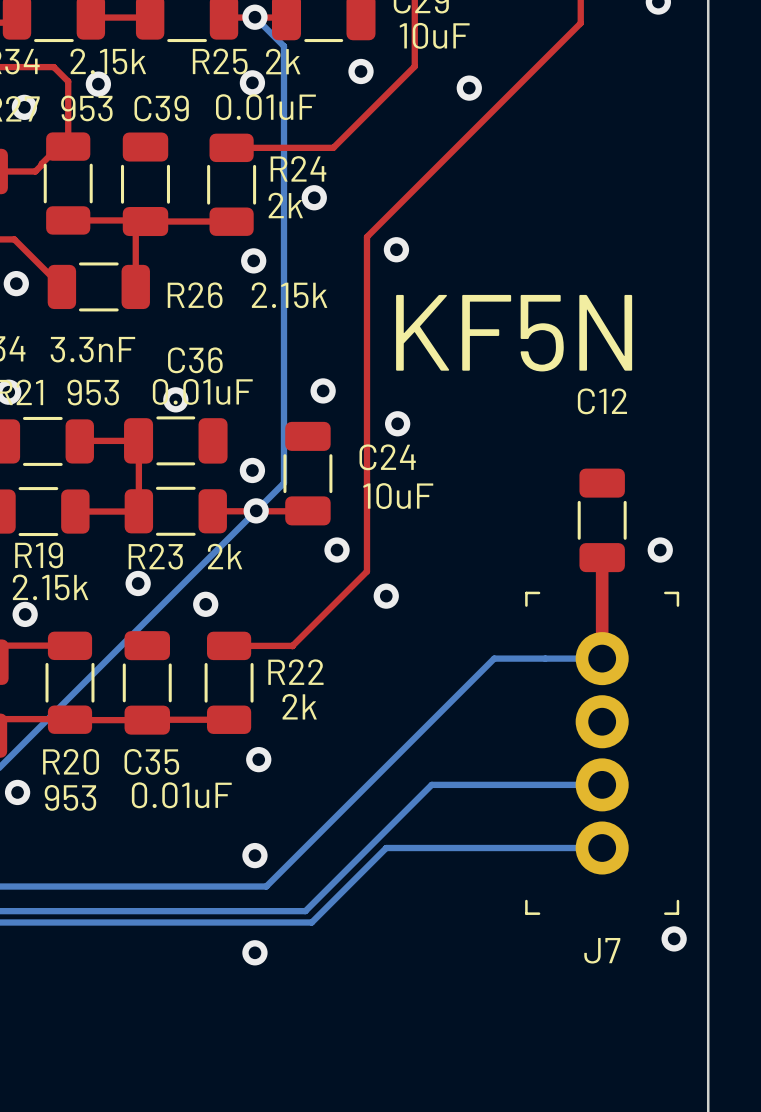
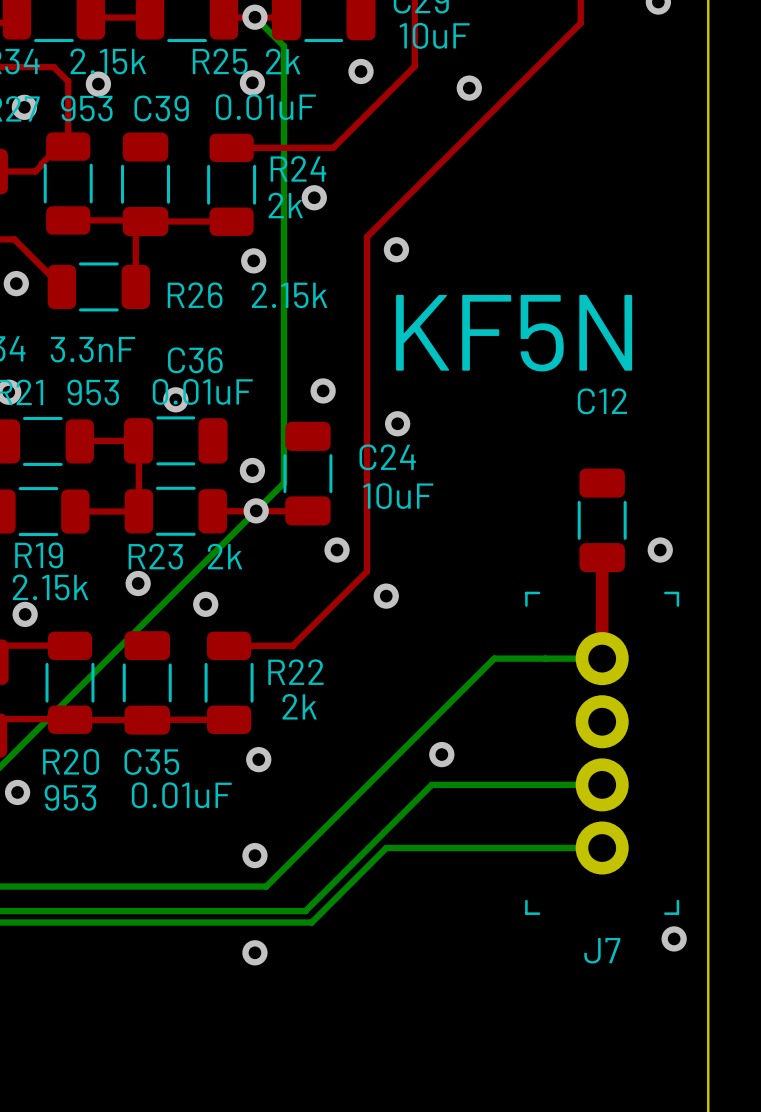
via: none -> (441, 754)

